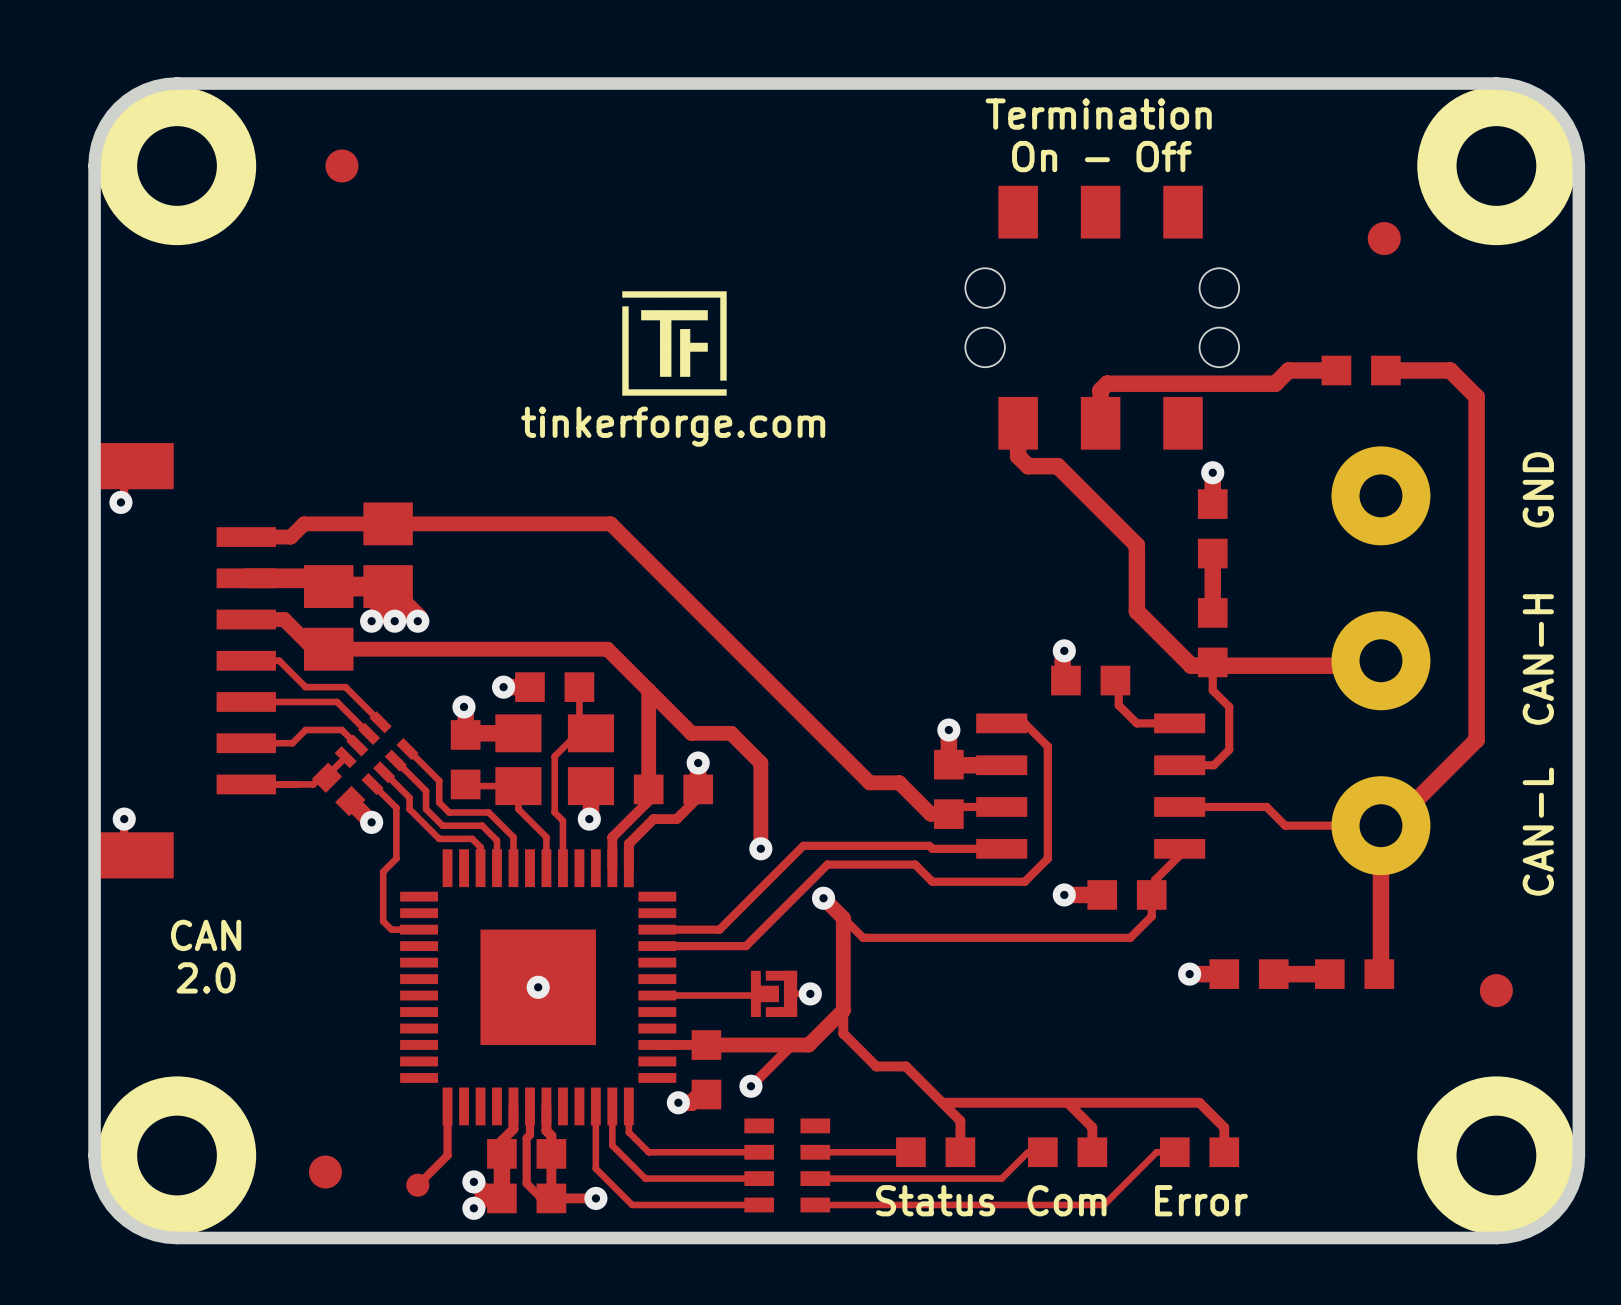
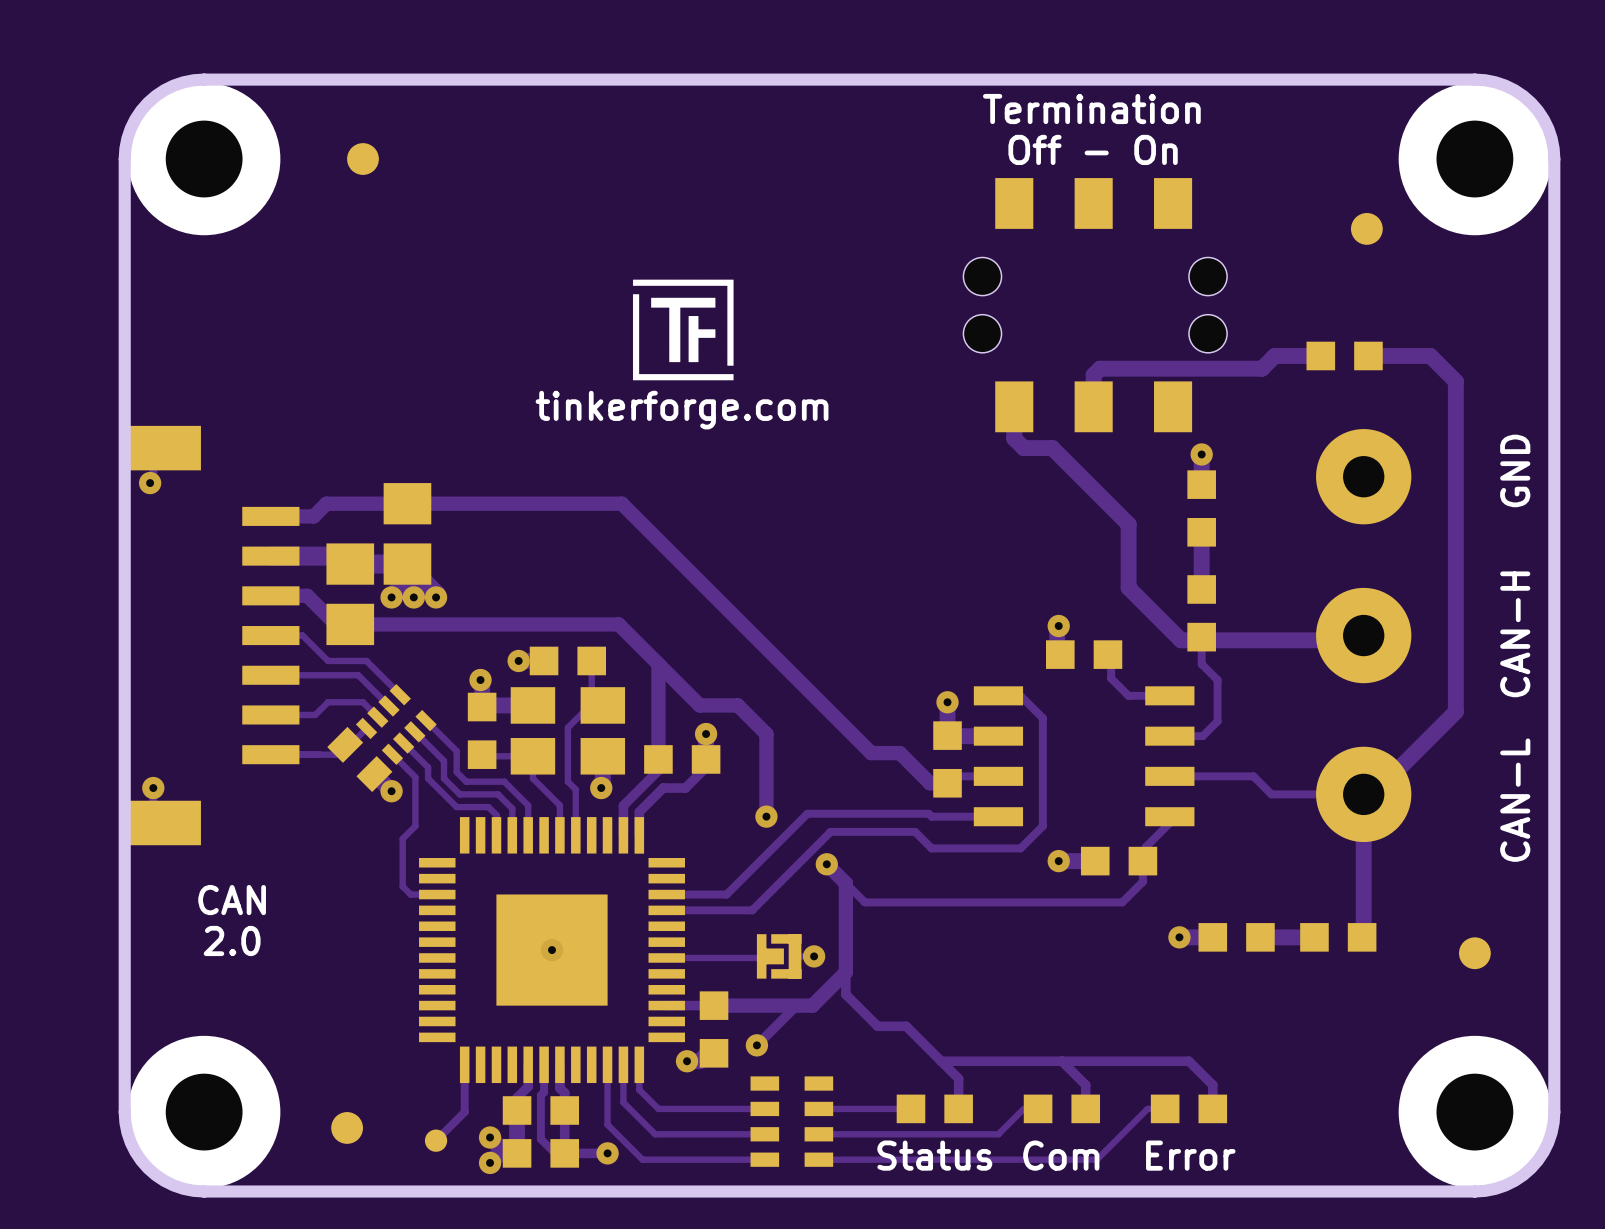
text: On - Off (1101, 156) -> Off - On (1093, 149)
part footprint: [311, 762, 366, 817] -> [327, 726, 393, 793]

